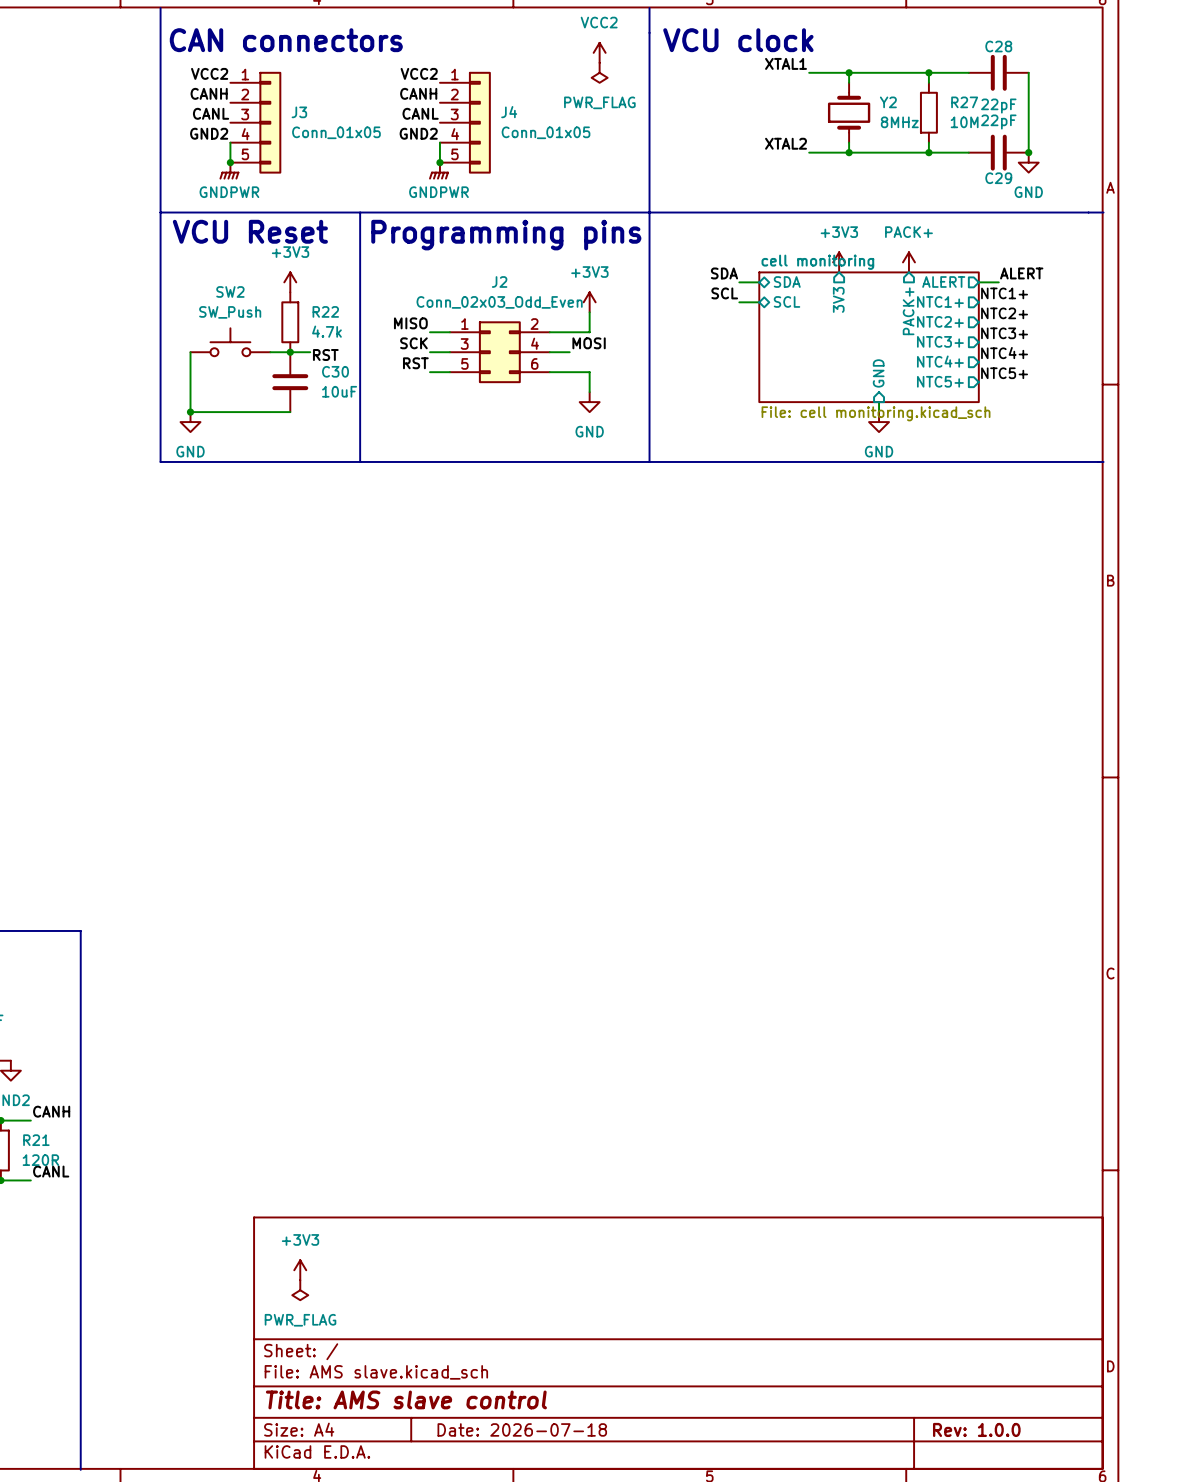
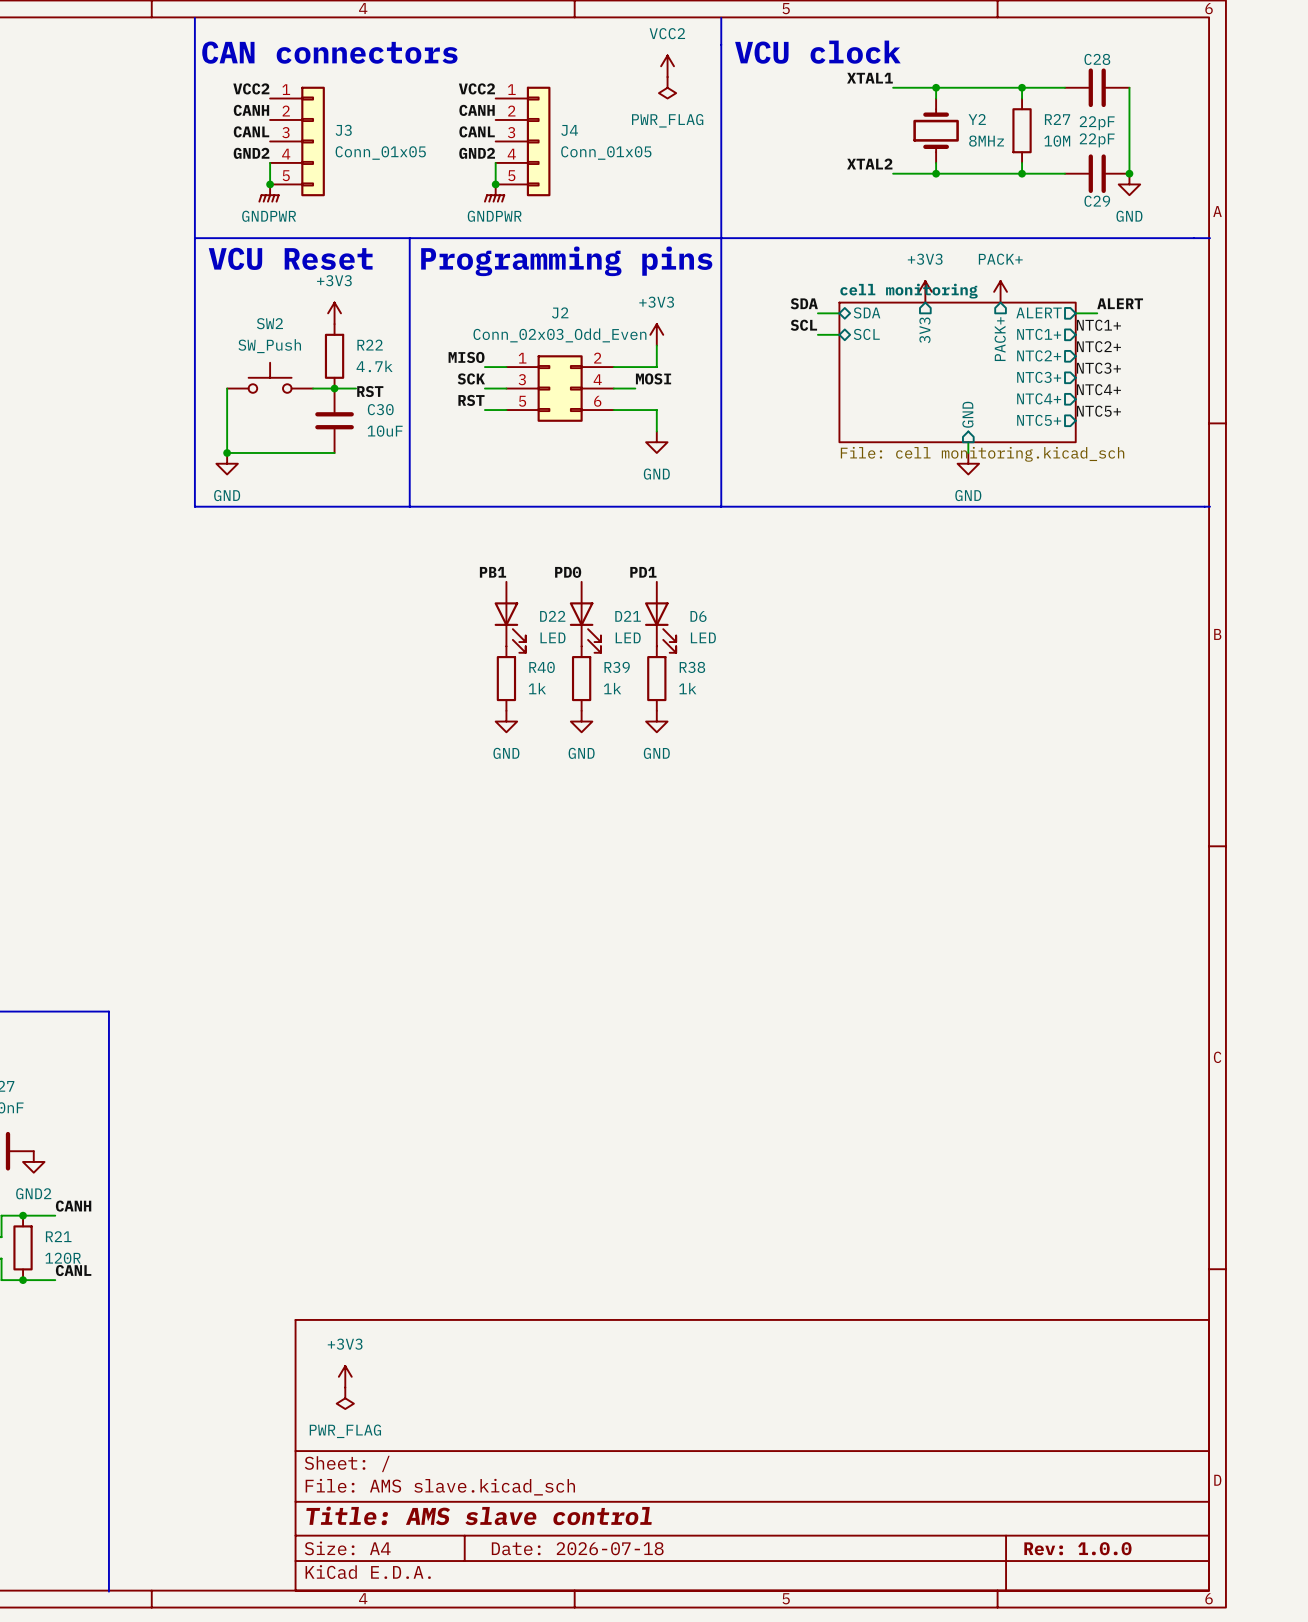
label: none -> PB1 (493, 572)
label: none -> PD0 (568, 572)
label: none -> PD1 (643, 572)
D22: none -> LED (510, 617)
D21: none -> LED (585, 617)
D6: none -> LED (660, 617)
R40: none -> 1k (506, 678)
R39: none -> 1k (581, 678)
R38: none -> 1k (656, 678)
power symbol: none -> GND (506, 721)
power symbol: none -> GND (581, 721)
power symbol: none -> GND (656, 721)

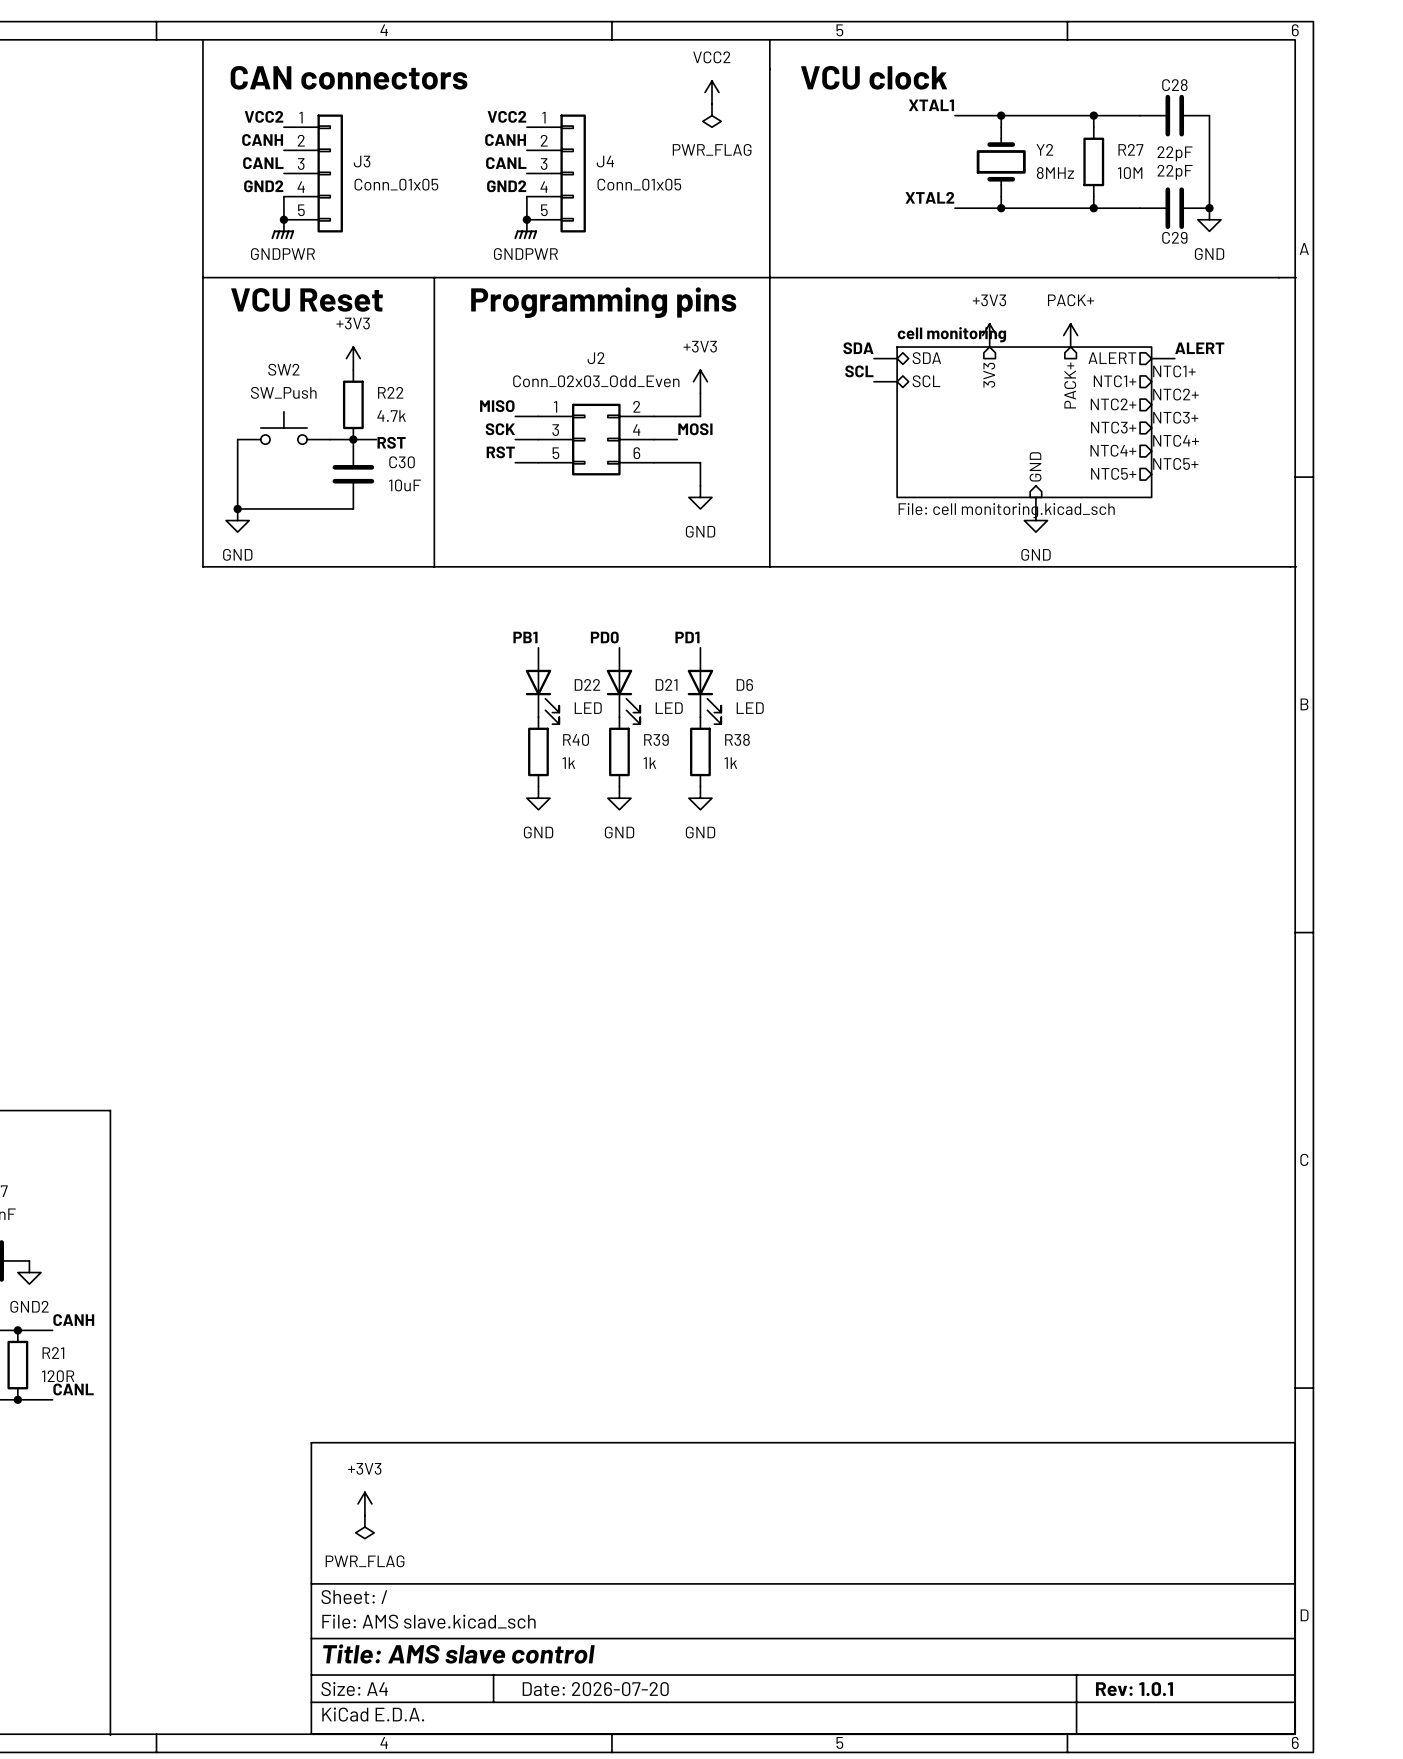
title block: Date: 2026-07-18 (577, 1548) -> Date: 2026-07-20 (595, 1689)
title block: Rev: 1.0.0 (1077, 1548) -> Rev: 1.0.1 (1134, 1689)

